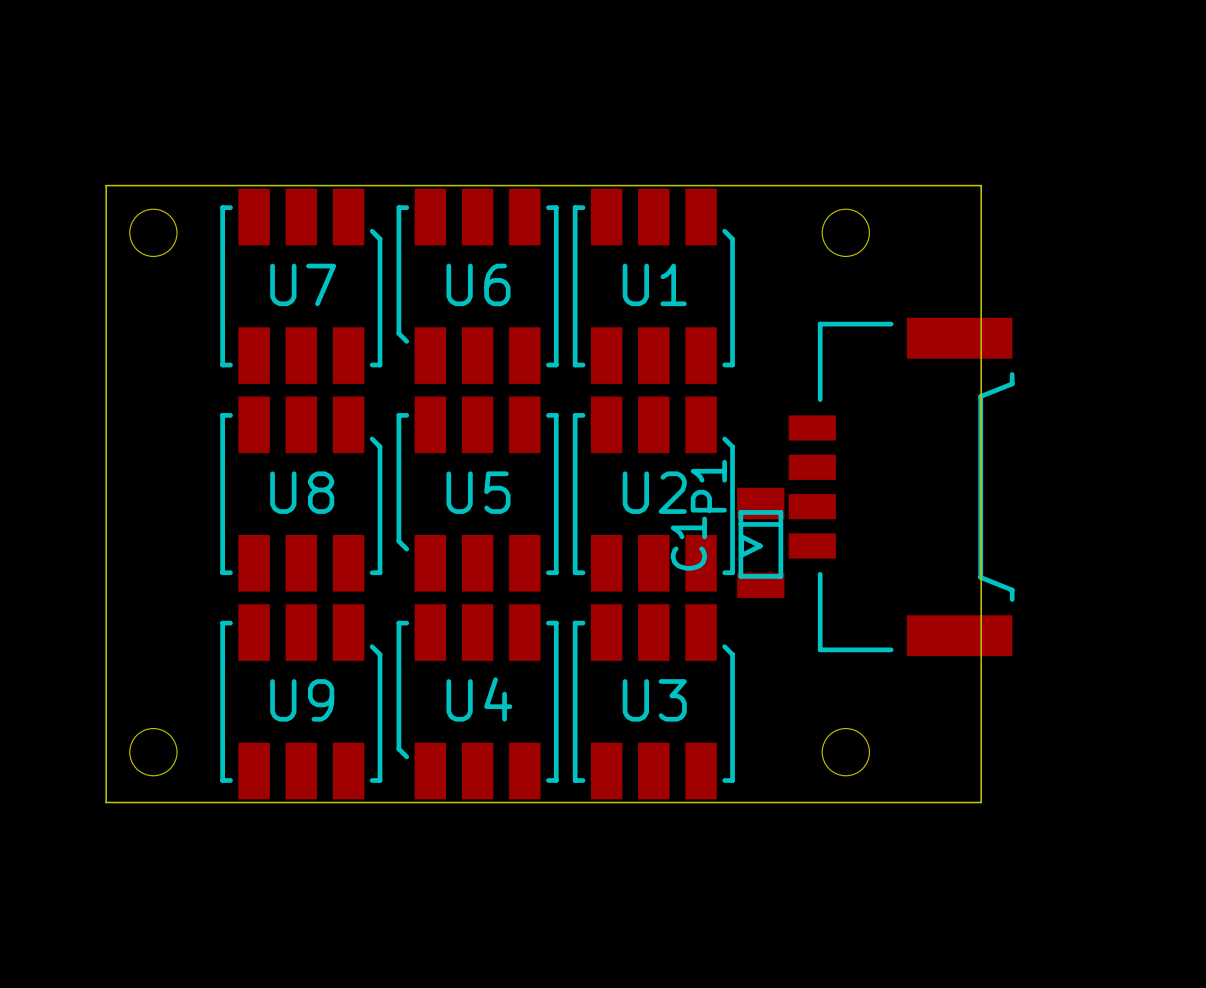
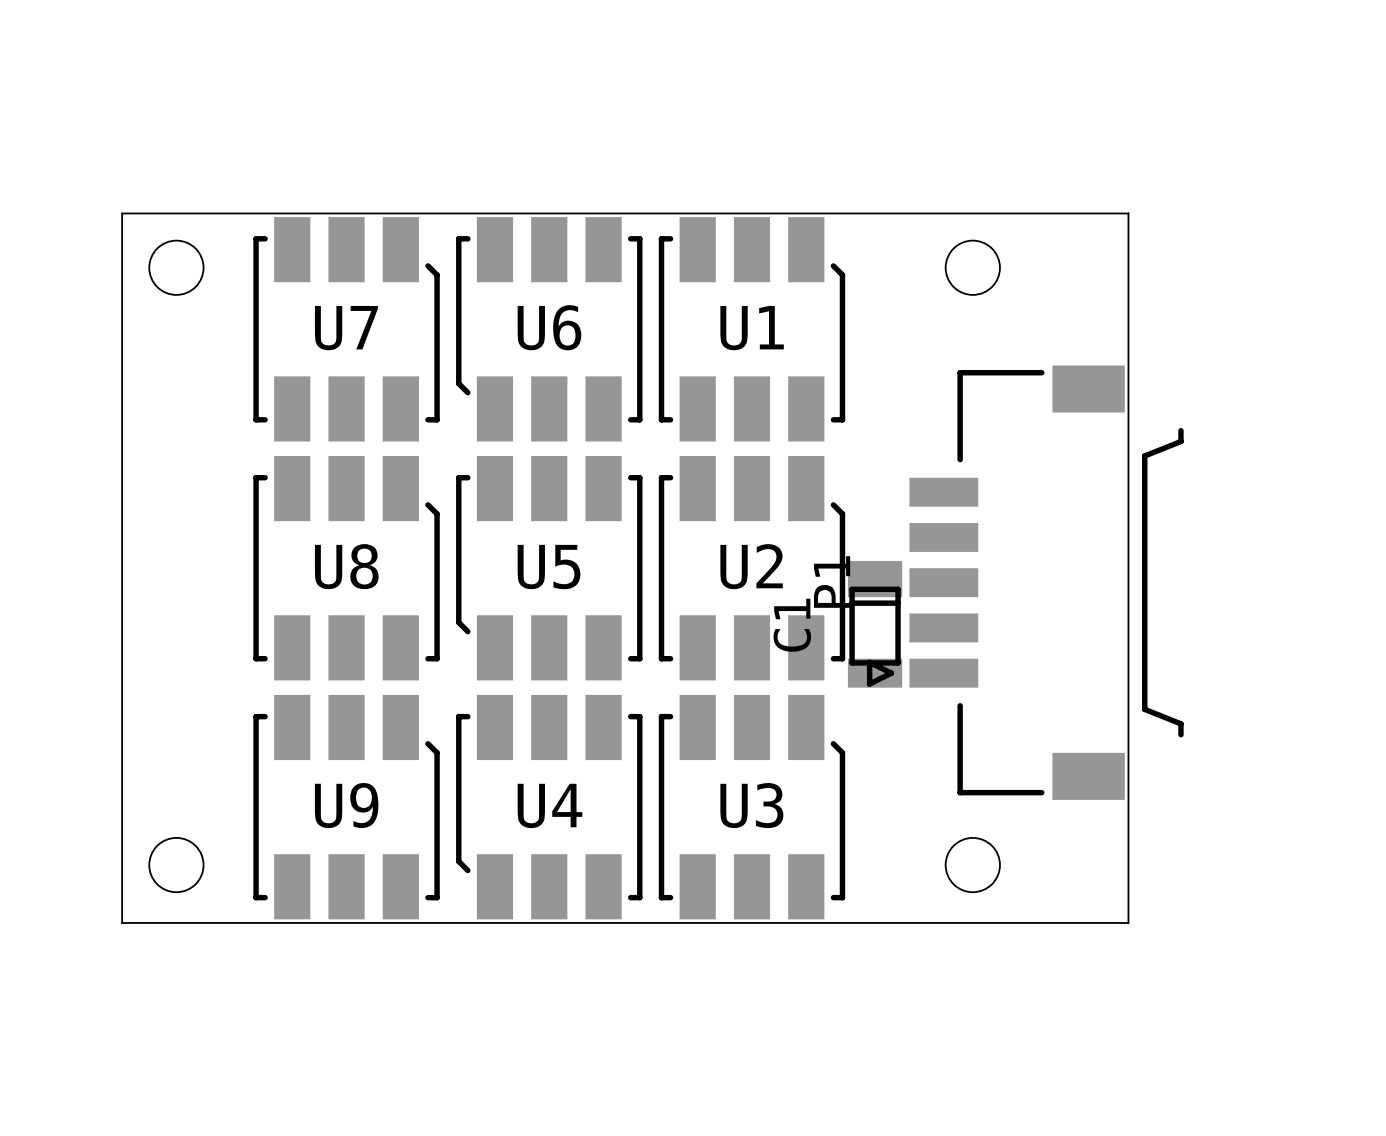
P1 footprint: [739, 317, 1015, 657] -> [866, 365, 1184, 800]

